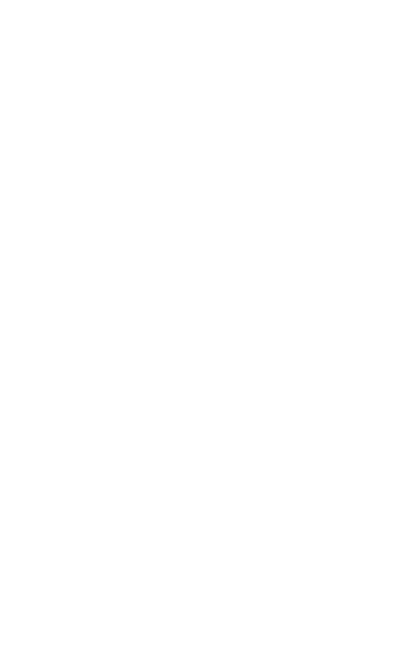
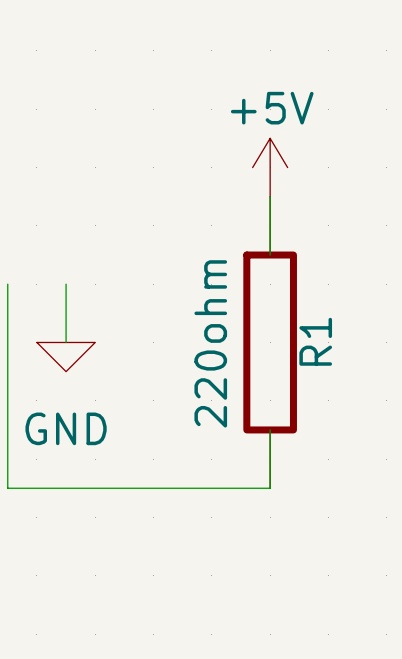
power symbol: none -> +5V (270, 167)
wire: none -> (270, 196) (270, 255)
wire: none -> (7, 284) (7, 488) (270, 488) (270, 429)
wire: none -> (66, 284) (66, 342)
R1: none -> 220ohm (270, 342)
power symbol: none -> GND (66, 357)

